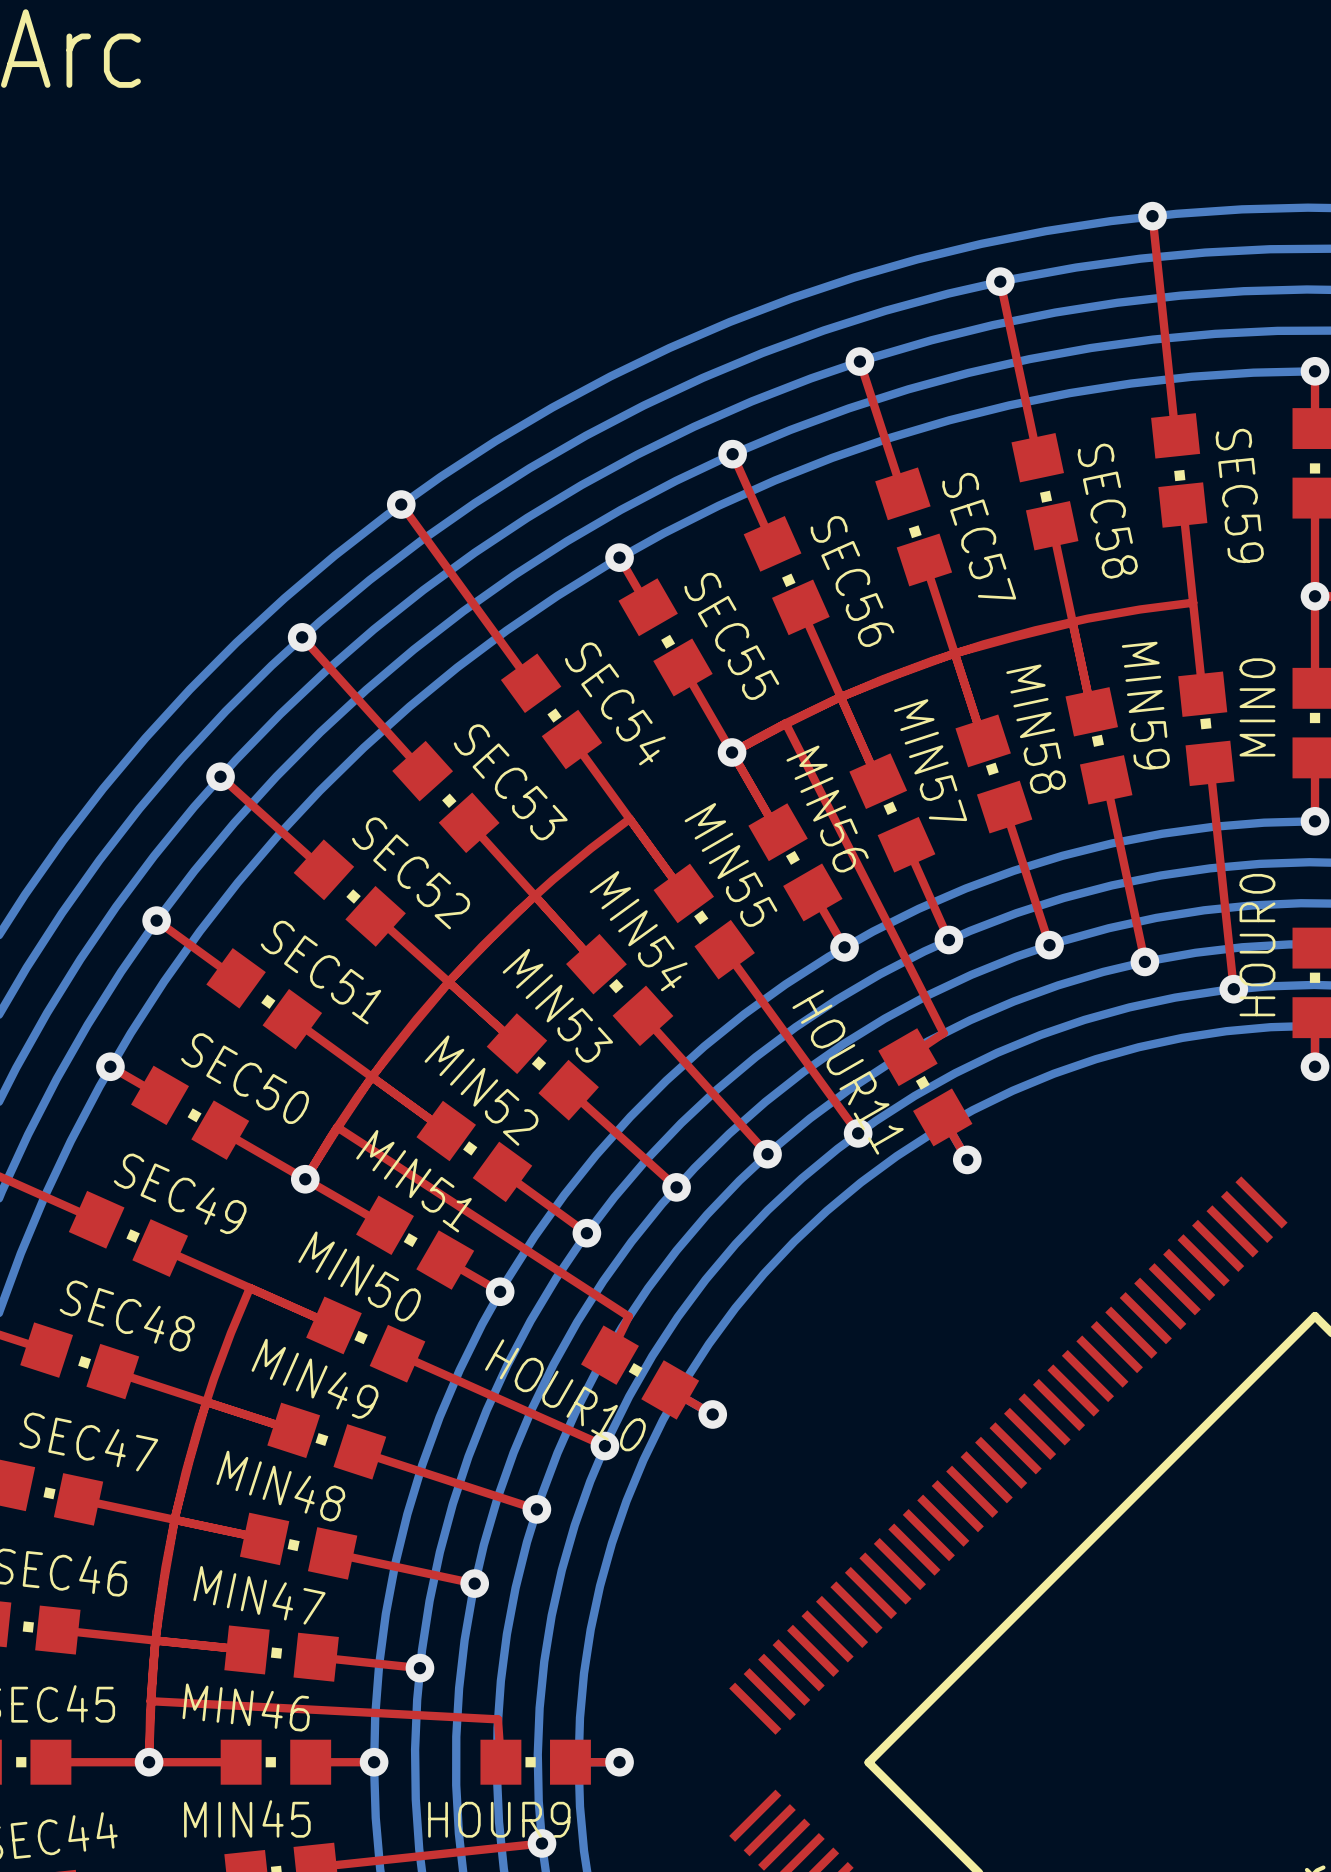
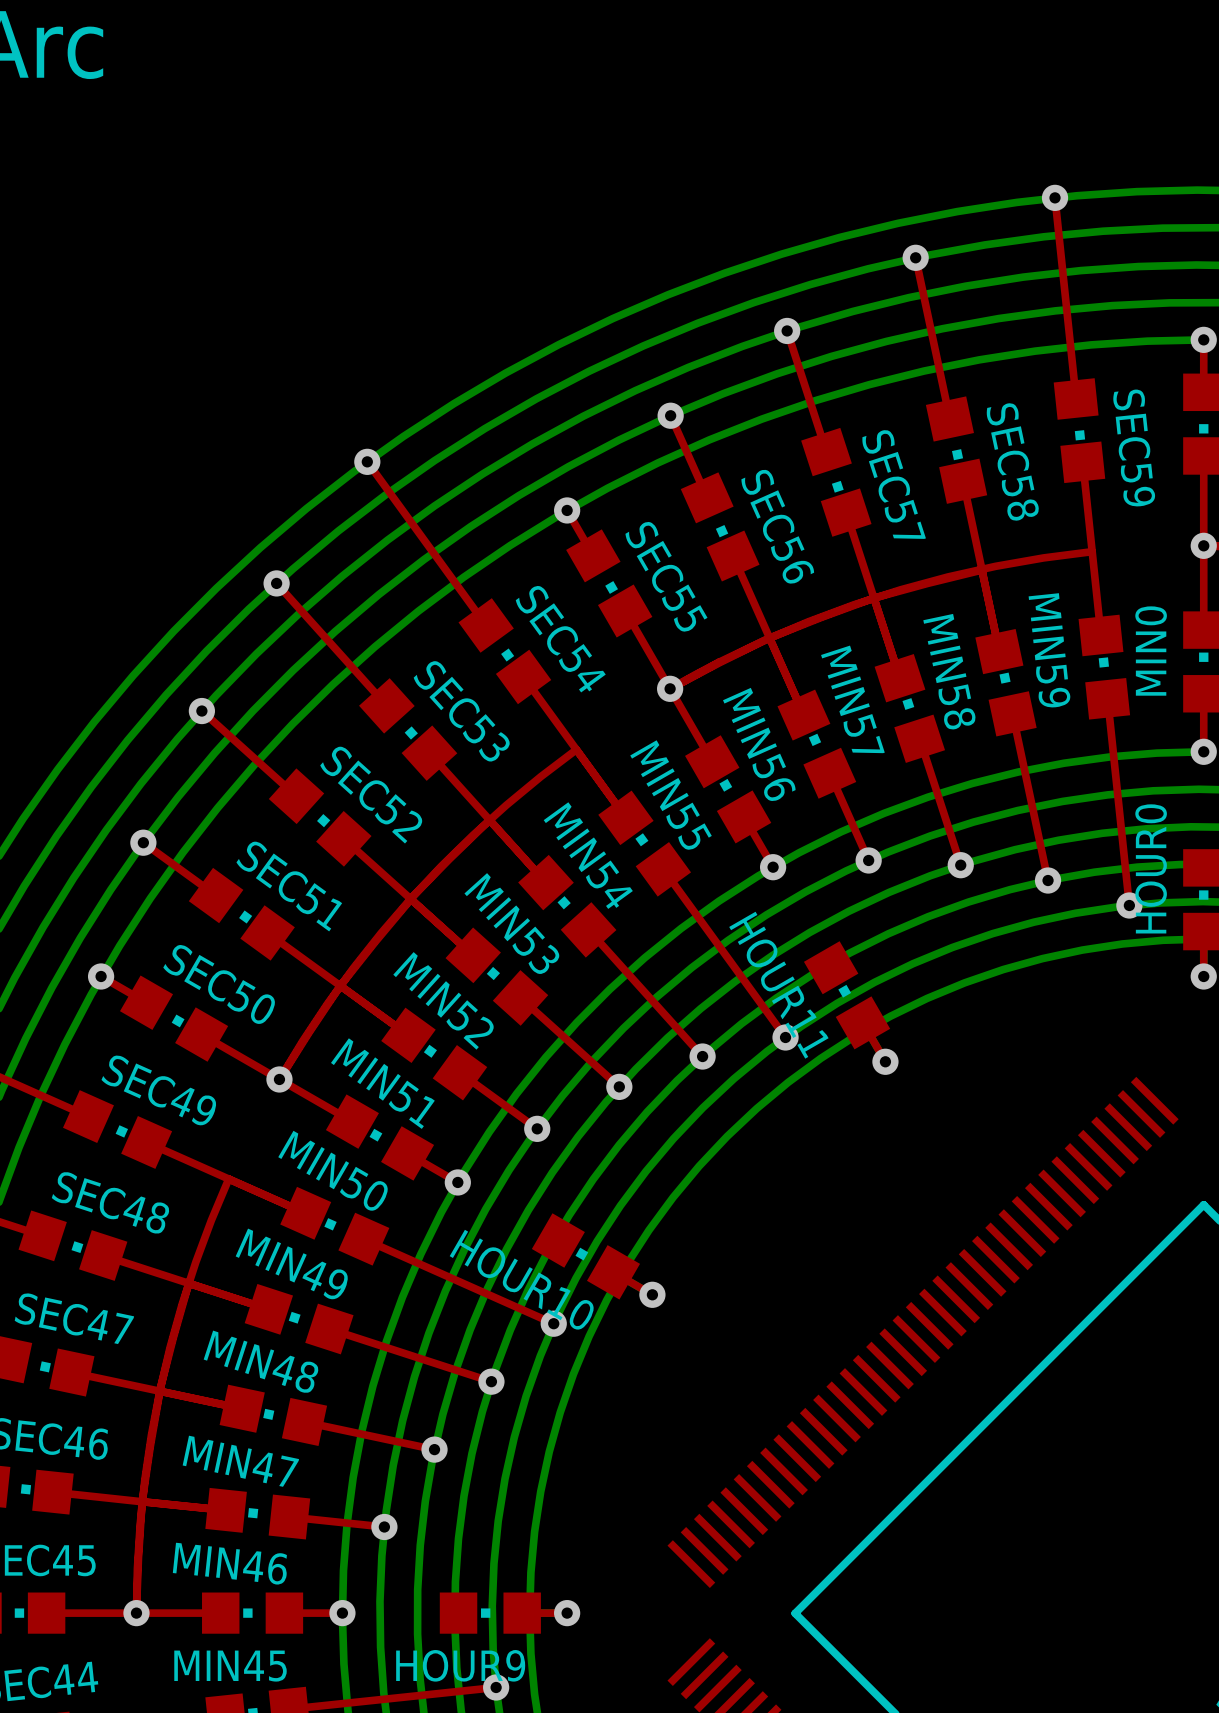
top track: (785, 723) (943, 1033) (907, 1057) -> none
top track: (305, 1179) (337, 1127) (628, 1316) (609, 1355) -> none
top track: (155, 1640) (150, 1701) (497, 1719) (500, 1762) -> none

